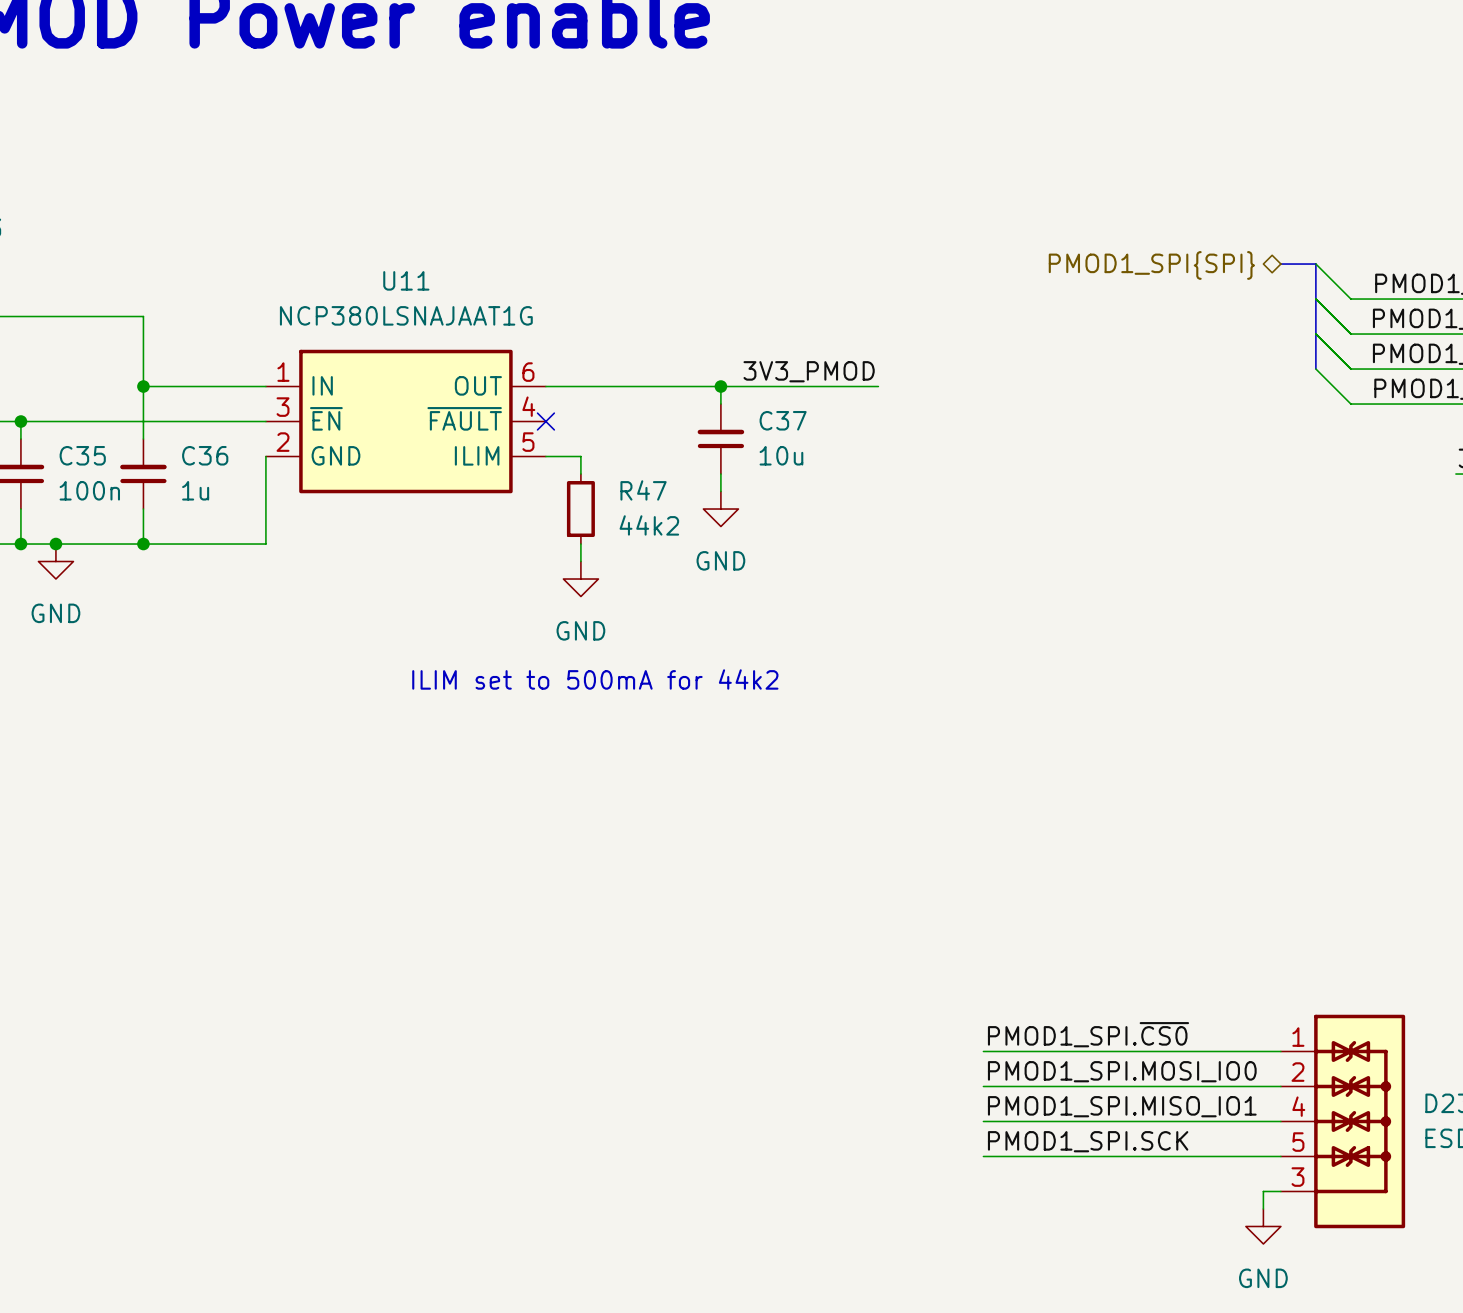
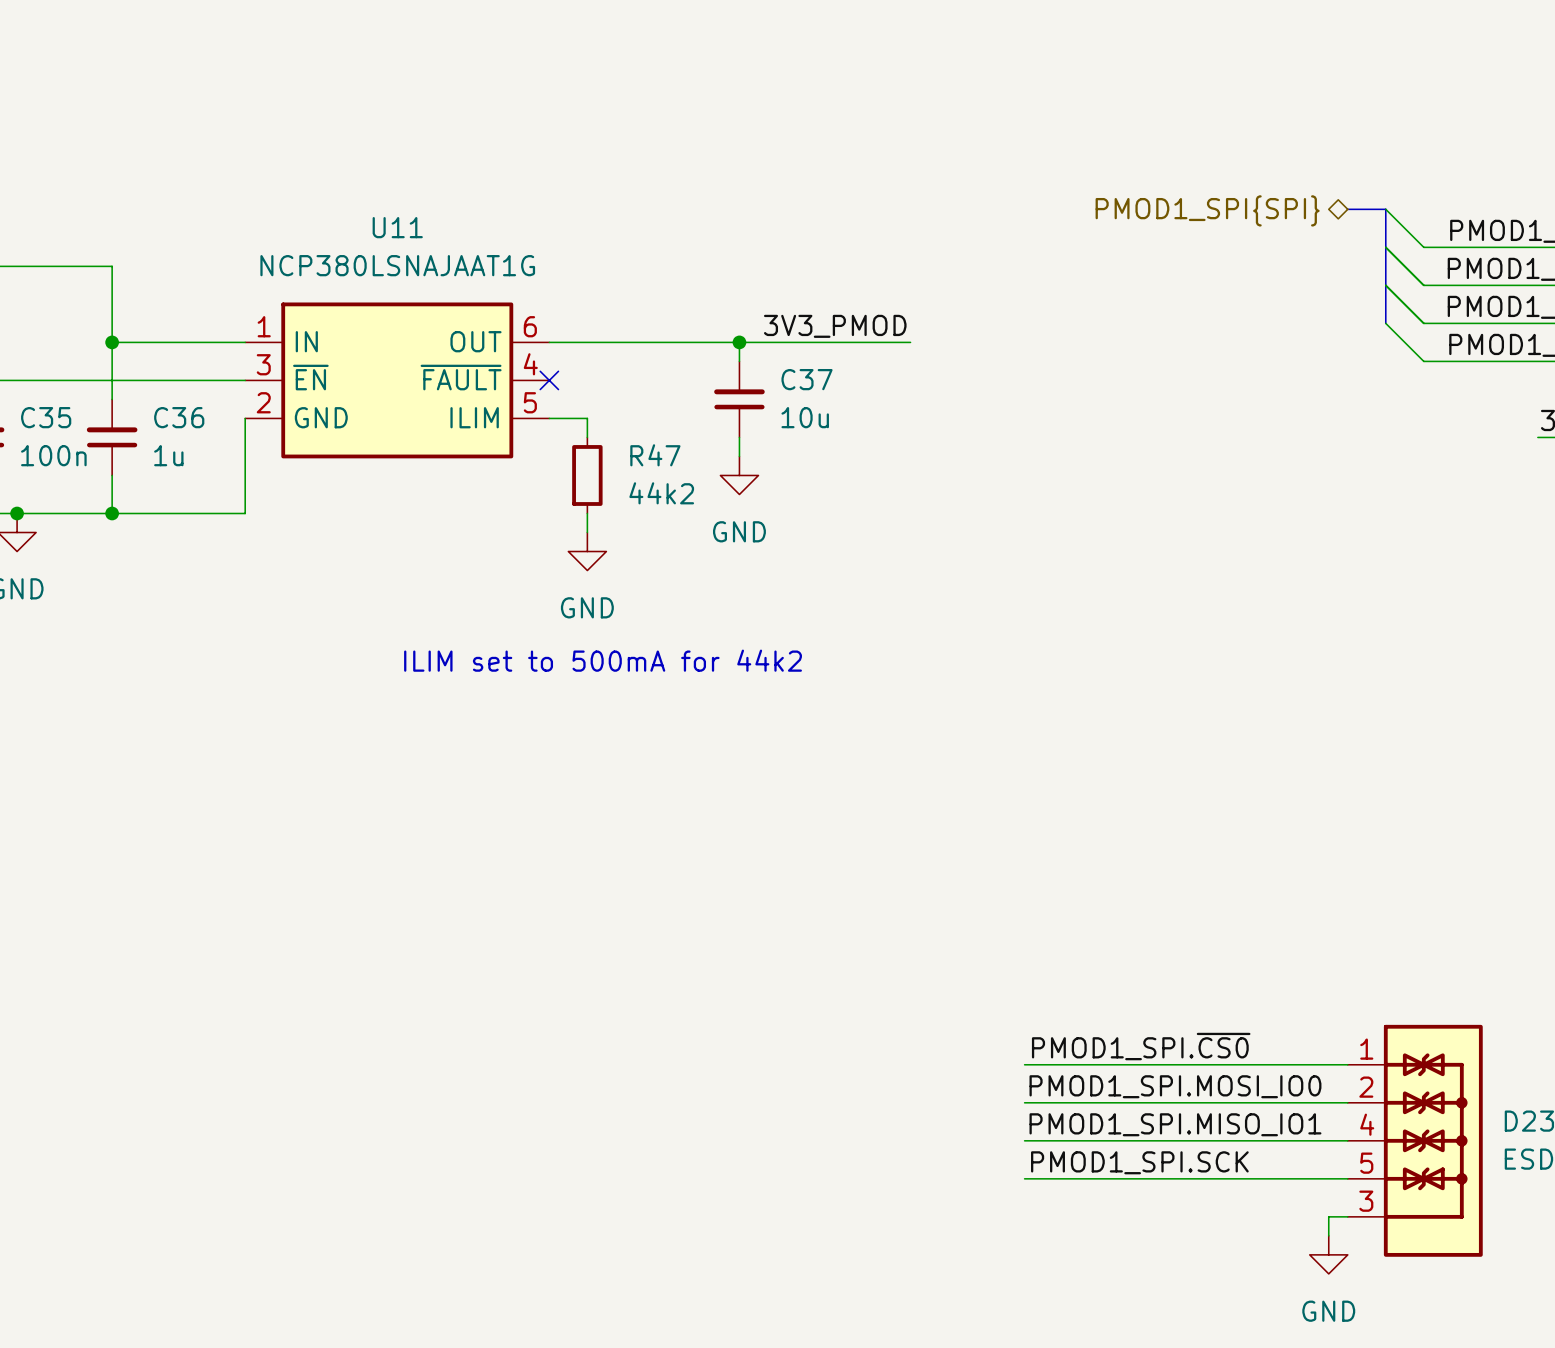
label position: PMOD1_SPI.~{CS0} (1088, 1034) -> PMOD1_SPI.~{CS0} (1141, 1046)
label position: PMOD1_SPI.SCK (1088, 1141) -> PMOD1_SPI.SCK (1139, 1162)

